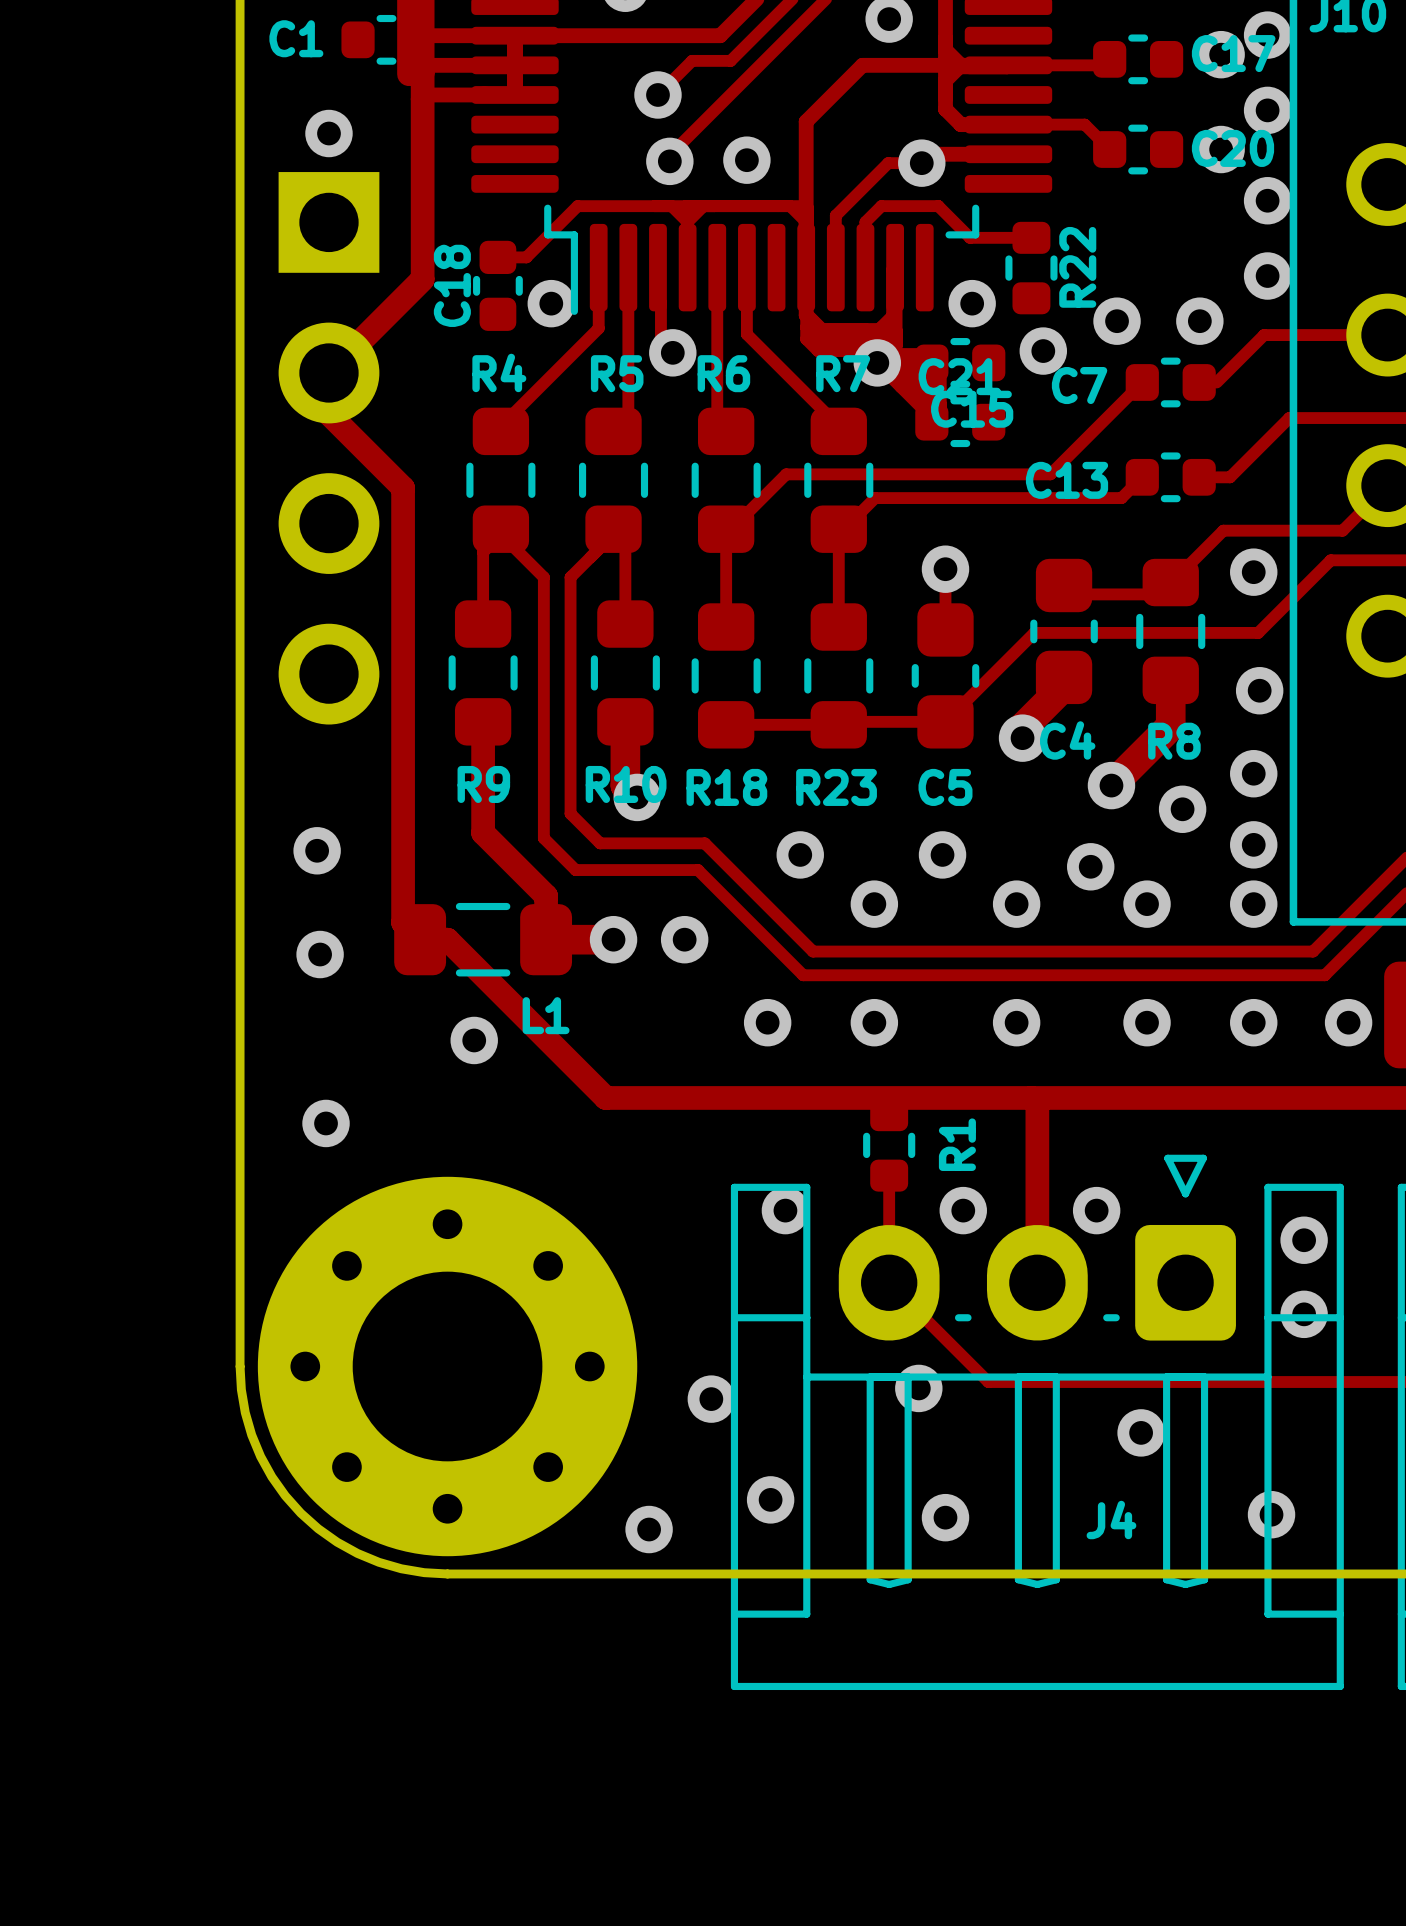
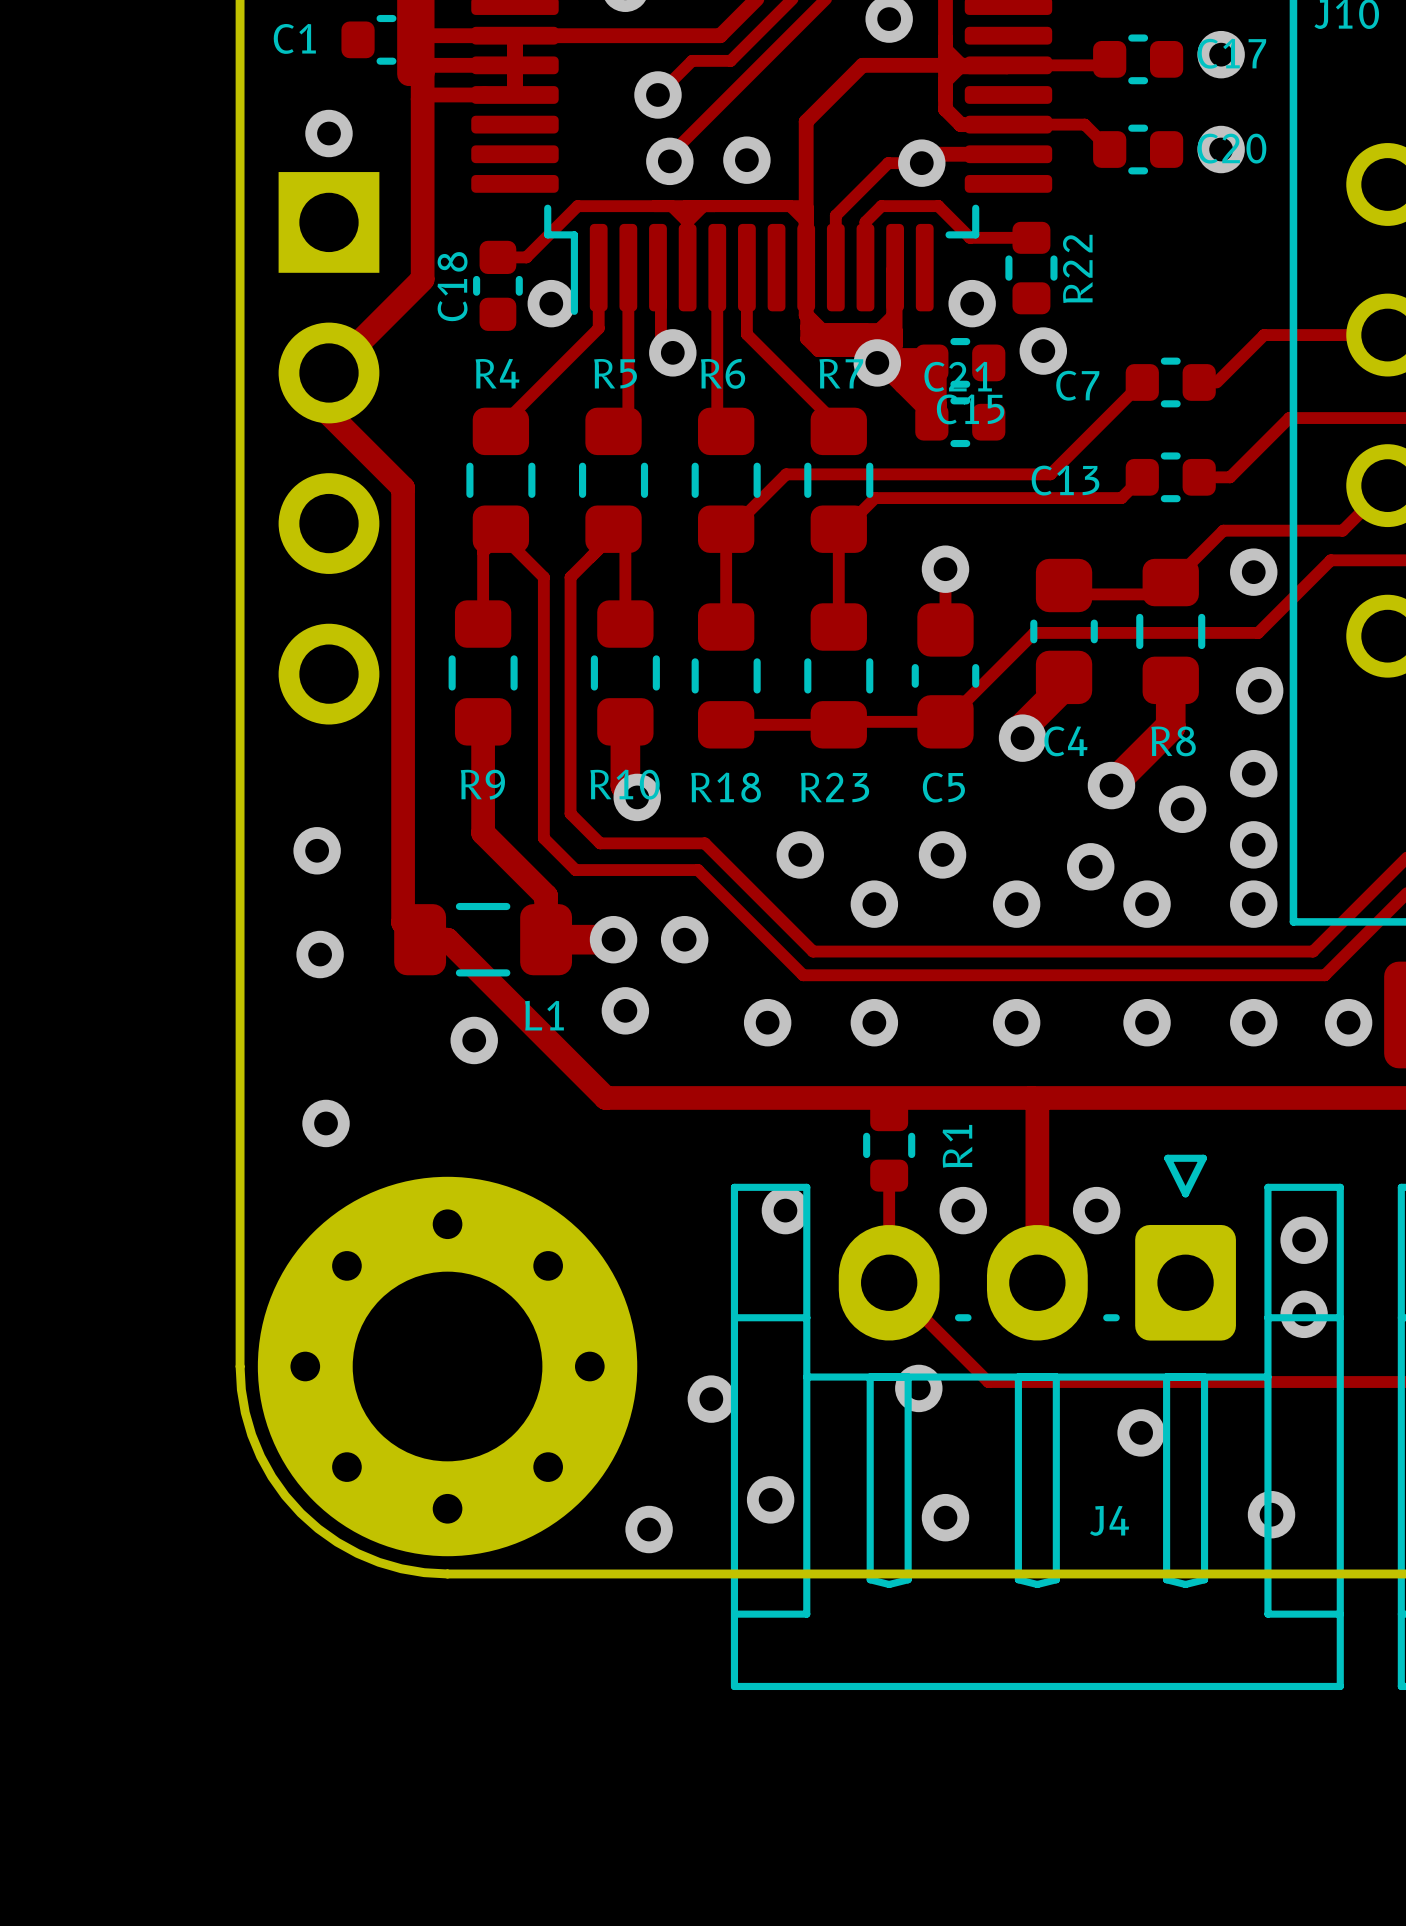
via: (1267, 35) -> none
via: (1267, 110) -> none
via: (1267, 200) -> none
via: (1267, 276) -> none
via: (1117, 321) -> none
via: (1199, 321) -> none
via: none -> (625, 1010)

